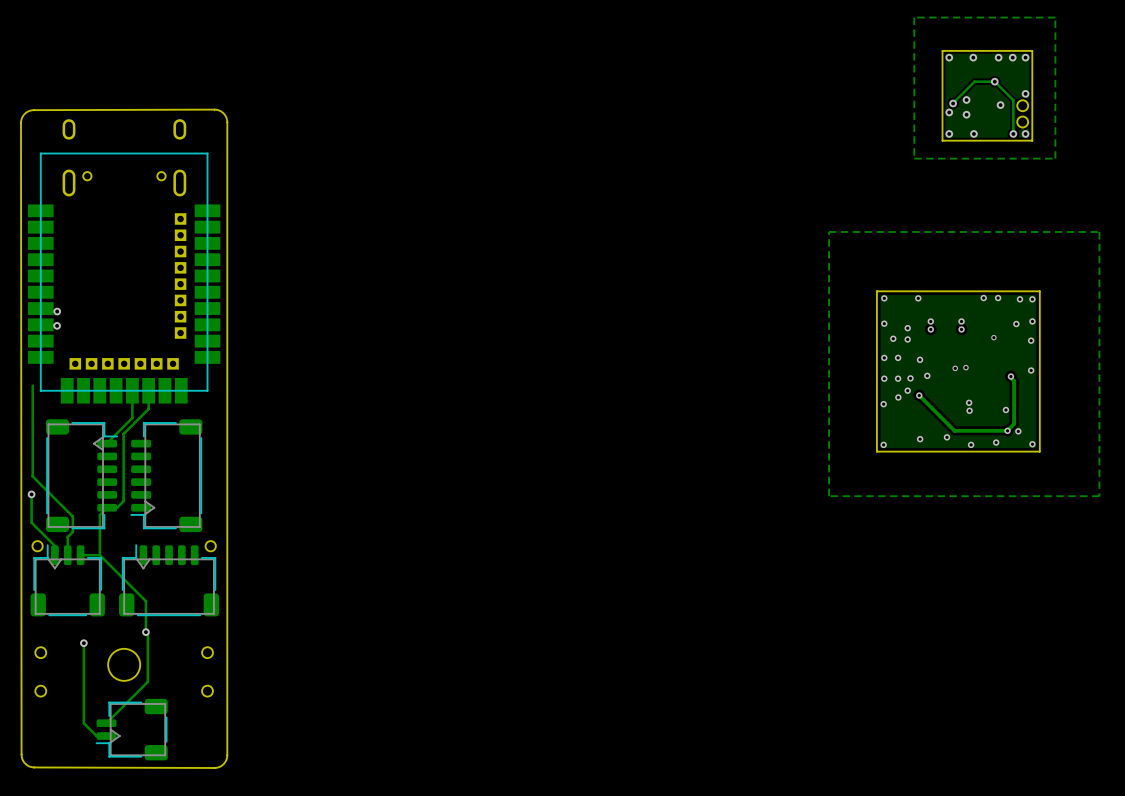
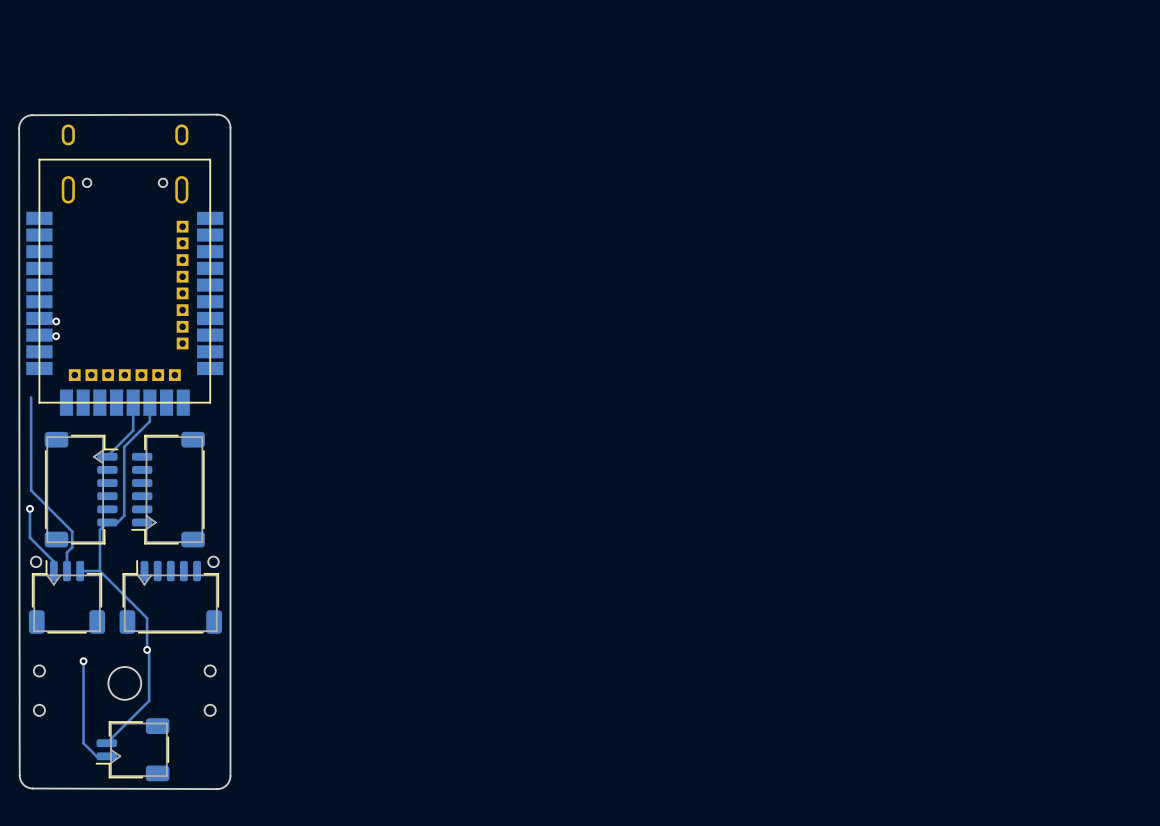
zone outline: (1055, 17) (1055, 158) (914, 158) (914, 17) (1055, 17) -> none
board edge: (1032, 50) (1032, 140) (942, 140) (942, 50) (1032, 50) -> none
via: (949, 57) -> none
via: (973, 57) -> none
via: (998, 57) -> none
via: (1012, 57) -> none
via: (1025, 57) -> none
via: (994, 81) -> none
via: (1025, 93) -> none
via: (966, 99) -> none
track: (953, 103) (974, 81) (994, 81) (1013, 100) (1013, 133) -> none
via: (953, 103) -> none
via: (1000, 105) -> none
via: (949, 112) -> none
part: (1022, 113) -> none
via: (966, 114) -> none
via: (949, 133) -> none
via: (973, 133) -> none
via: (1013, 133) -> none
via: (1025, 133) -> none
zone outline: (1099, 231) (1099, 496) (829, 496) (829, 231) (1099, 231) -> none
board edge: (1039, 291) (1039, 451) (876, 451) (876, 291) (1039, 291) -> none
via: (884, 298) -> none
via: (918, 298) -> none
via: (983, 298) -> none
via: (998, 298) -> none
via: (1019, 299) -> none
via: (1032, 299) -> none
via: (930, 321) -> none
via: (961, 321) -> none
via: (1032, 321) -> none
via: (884, 323) -> none
via: (1016, 323) -> none
via: (907, 328) -> none
via: (930, 329) -> none
via: (961, 329) -> none
via: (993, 337) -> none
via: (893, 338) -> none
via: (907, 339) -> none
via: (1031, 340) -> none
via: (884, 357) -> none
via: (898, 357) -> none
via: (920, 359) -> none
via: (965, 367) -> none
via: (955, 368) -> none
via: (1031, 370) -> none
via: (927, 375) -> none
via: (1010, 376) -> none
via: (884, 378) -> none
via: (898, 378) -> none
via: (910, 378) -> none
track: (1011, 378) (1014, 381) (1014, 423) (1007, 430) -> none
via: (907, 390) -> none
track: (919, 395) (954, 430) (1007, 430) -> none
via: (919, 395) -> none
via: (898, 397) -> none
via: (969, 402) -> none
via: (883, 404) -> none
via: (1005, 409) -> none
via: (969, 410) -> none
via: (1007, 430) -> none
via: (1018, 431) -> none
via: (946, 437) -> none
via: (920, 439) -> none
via: (996, 442) -> none
via: (883, 444) -> none
via: (971, 444) -> none
via: (1032, 444) -> none

